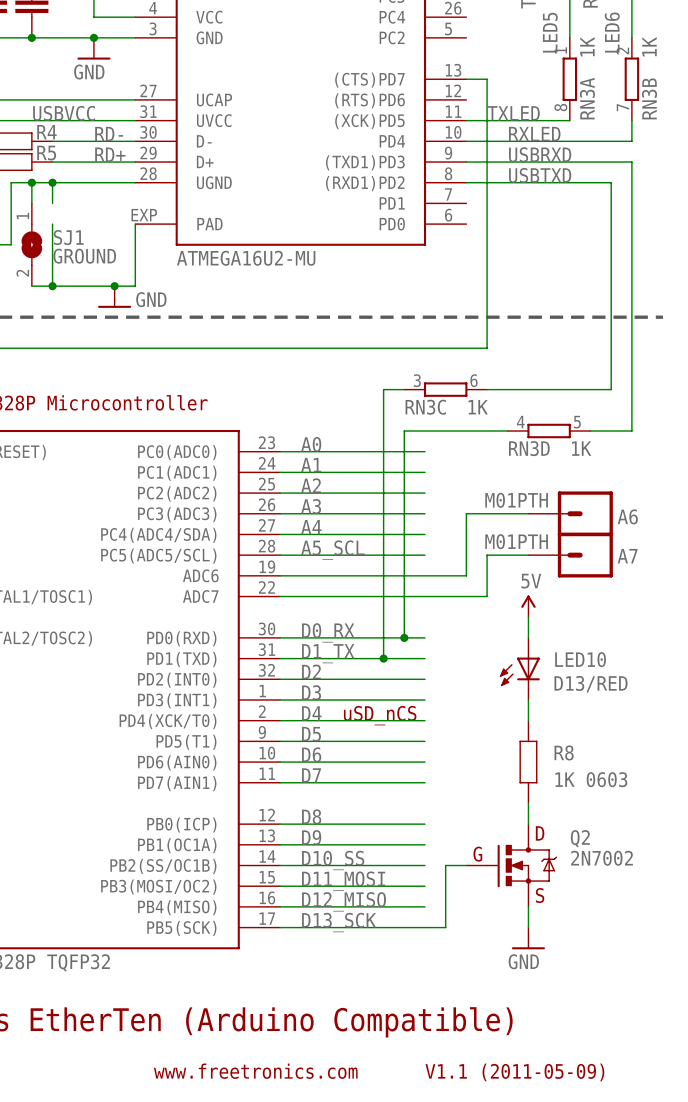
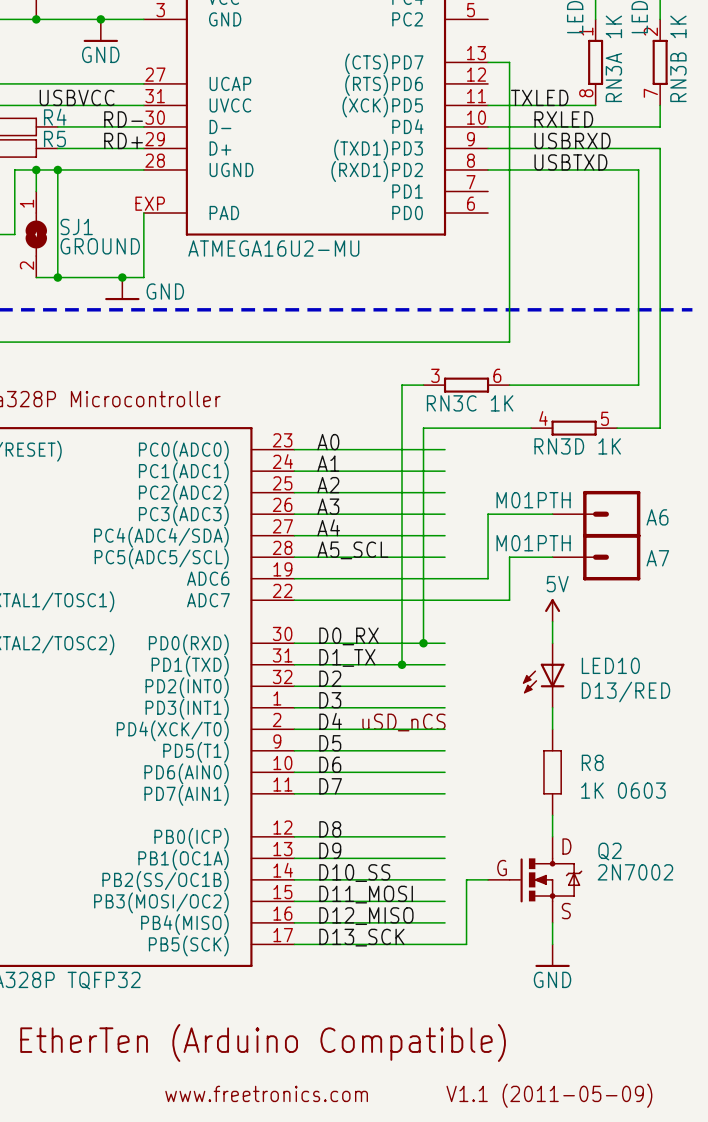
wire: none -> (57, 191) (57, 213)

